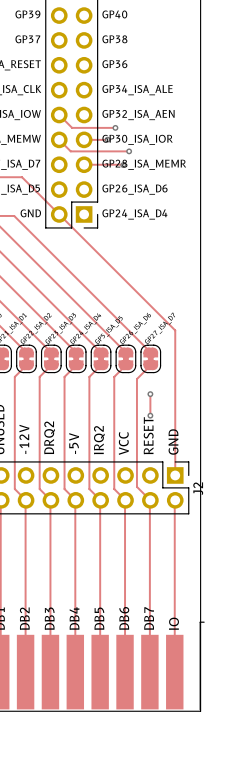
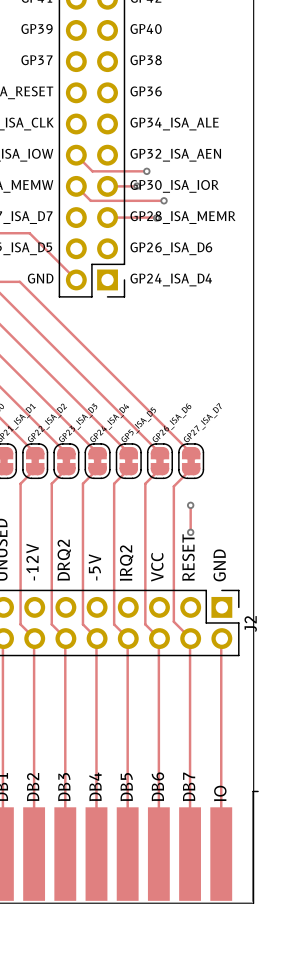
track: (59, 214) (175, 330) (175, 475) -> none

